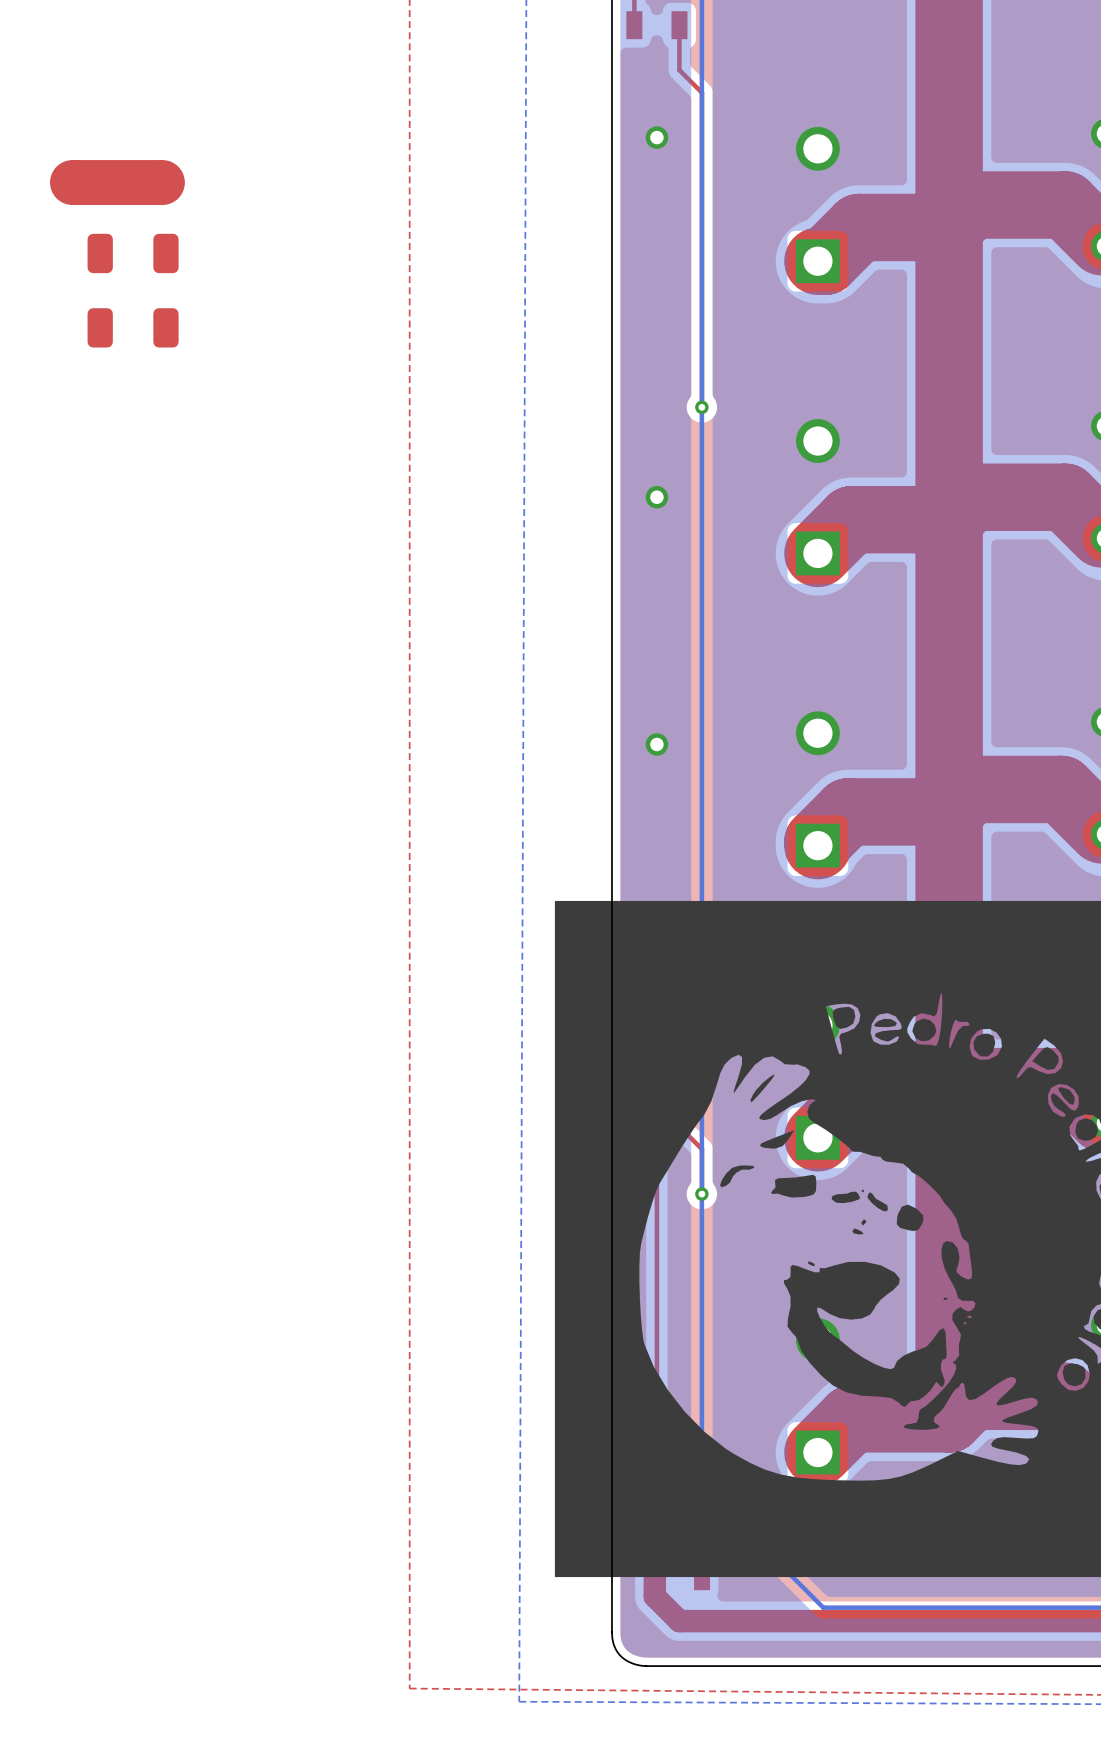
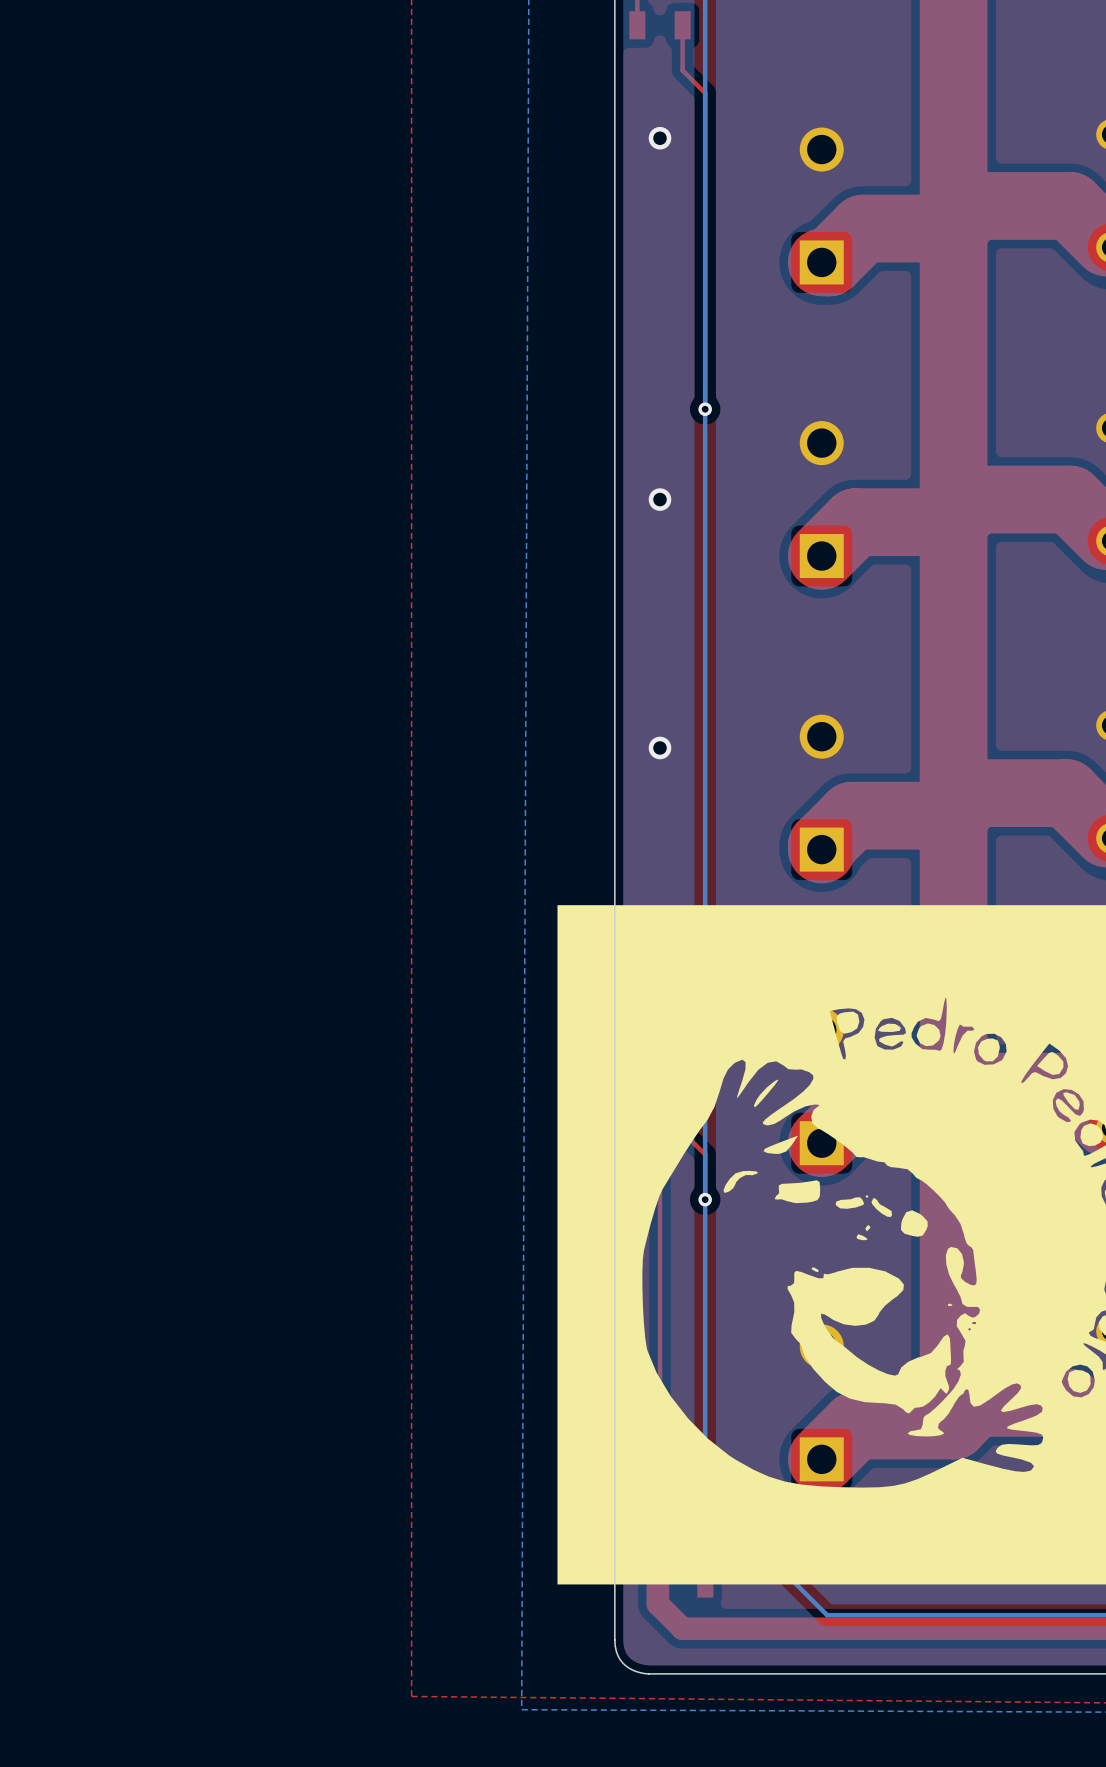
part: (117, 182) -> none
part: (133, 253) -> none
part: (133, 327) -> none

